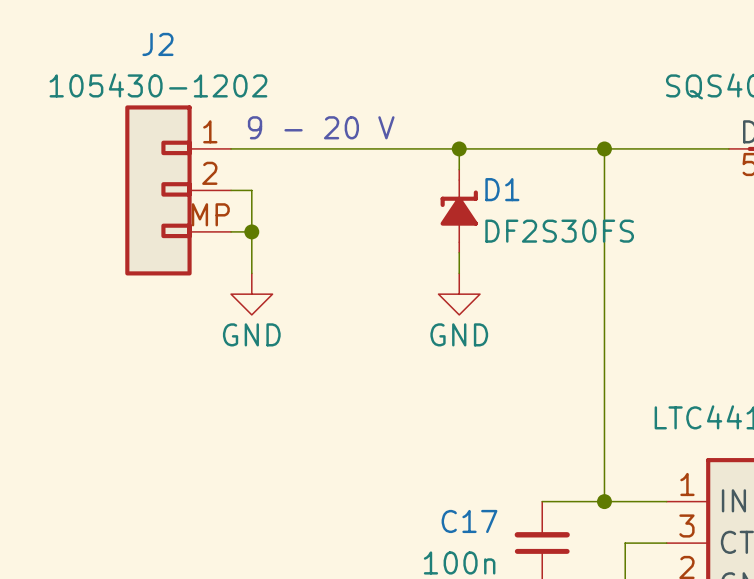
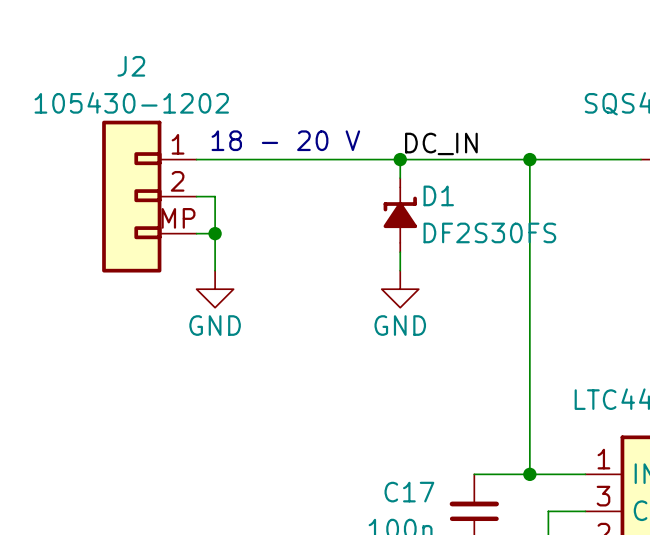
text: 9 - 20 V (321, 127) -> 18 - 20 V (285, 140)
label: none -> DC_IN (441, 143)

